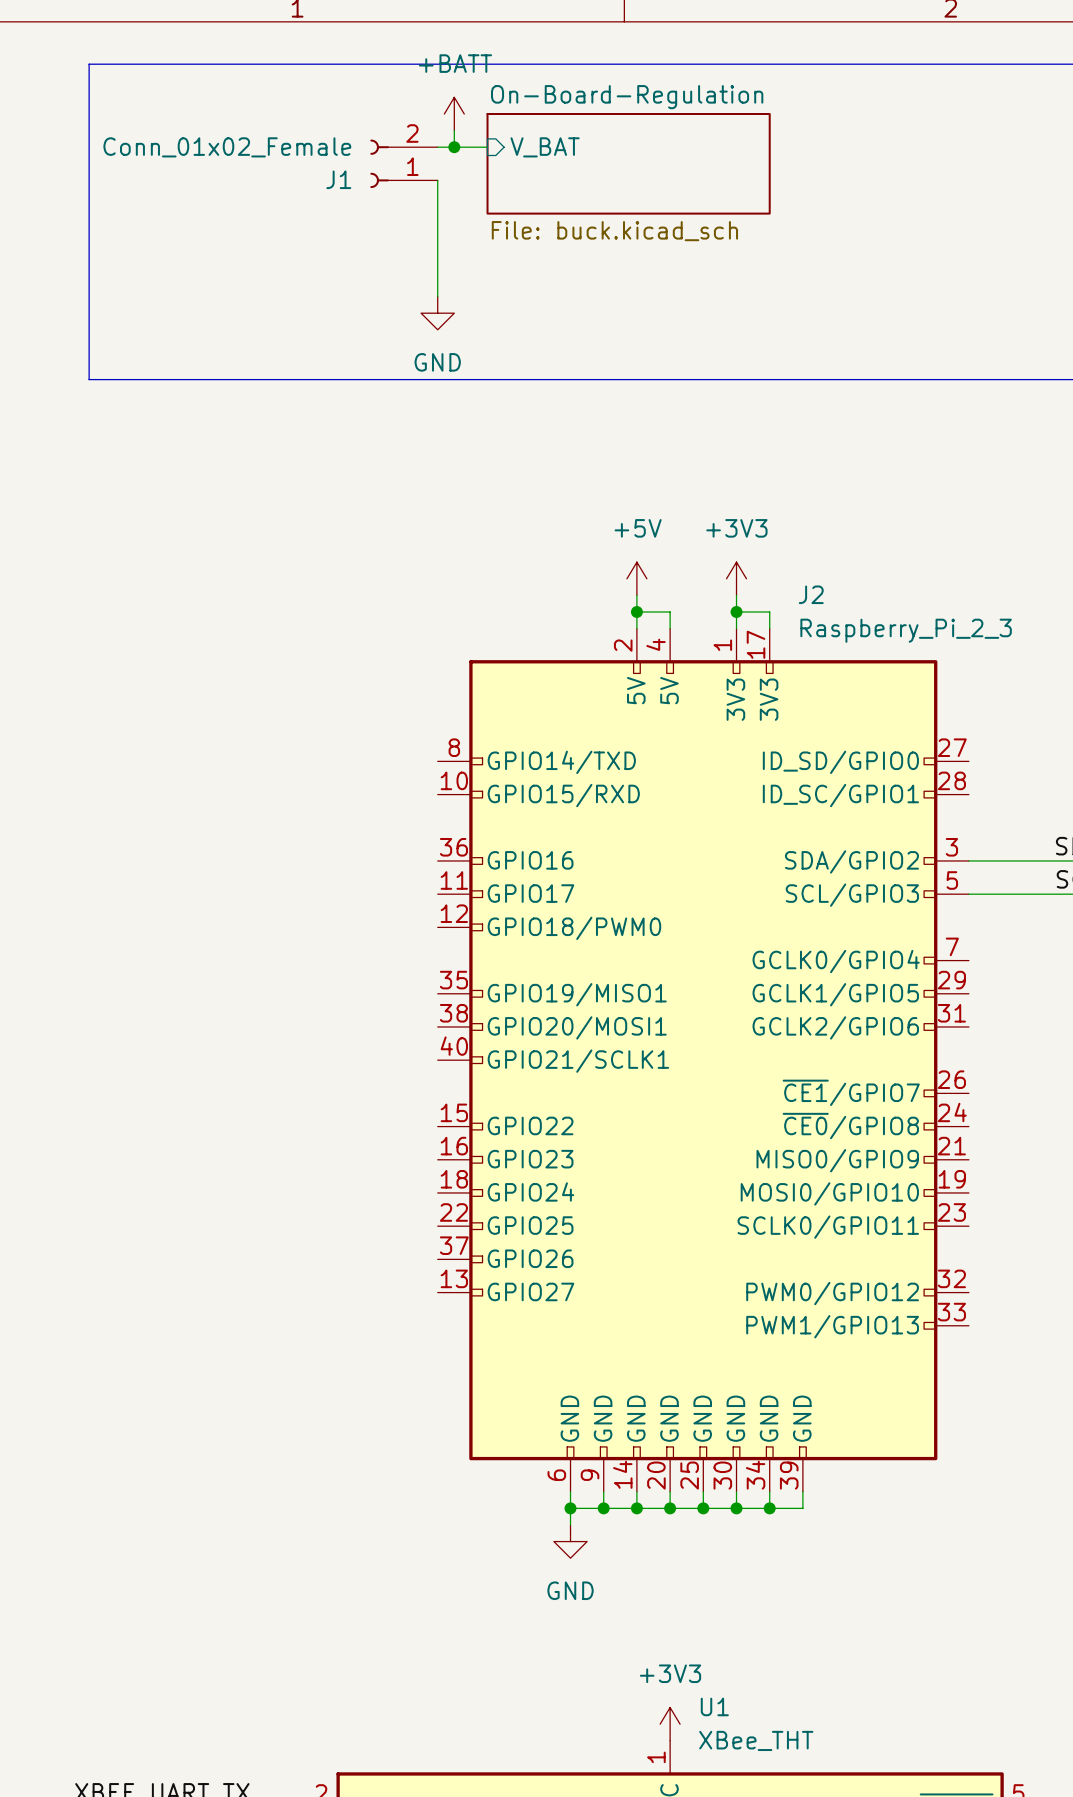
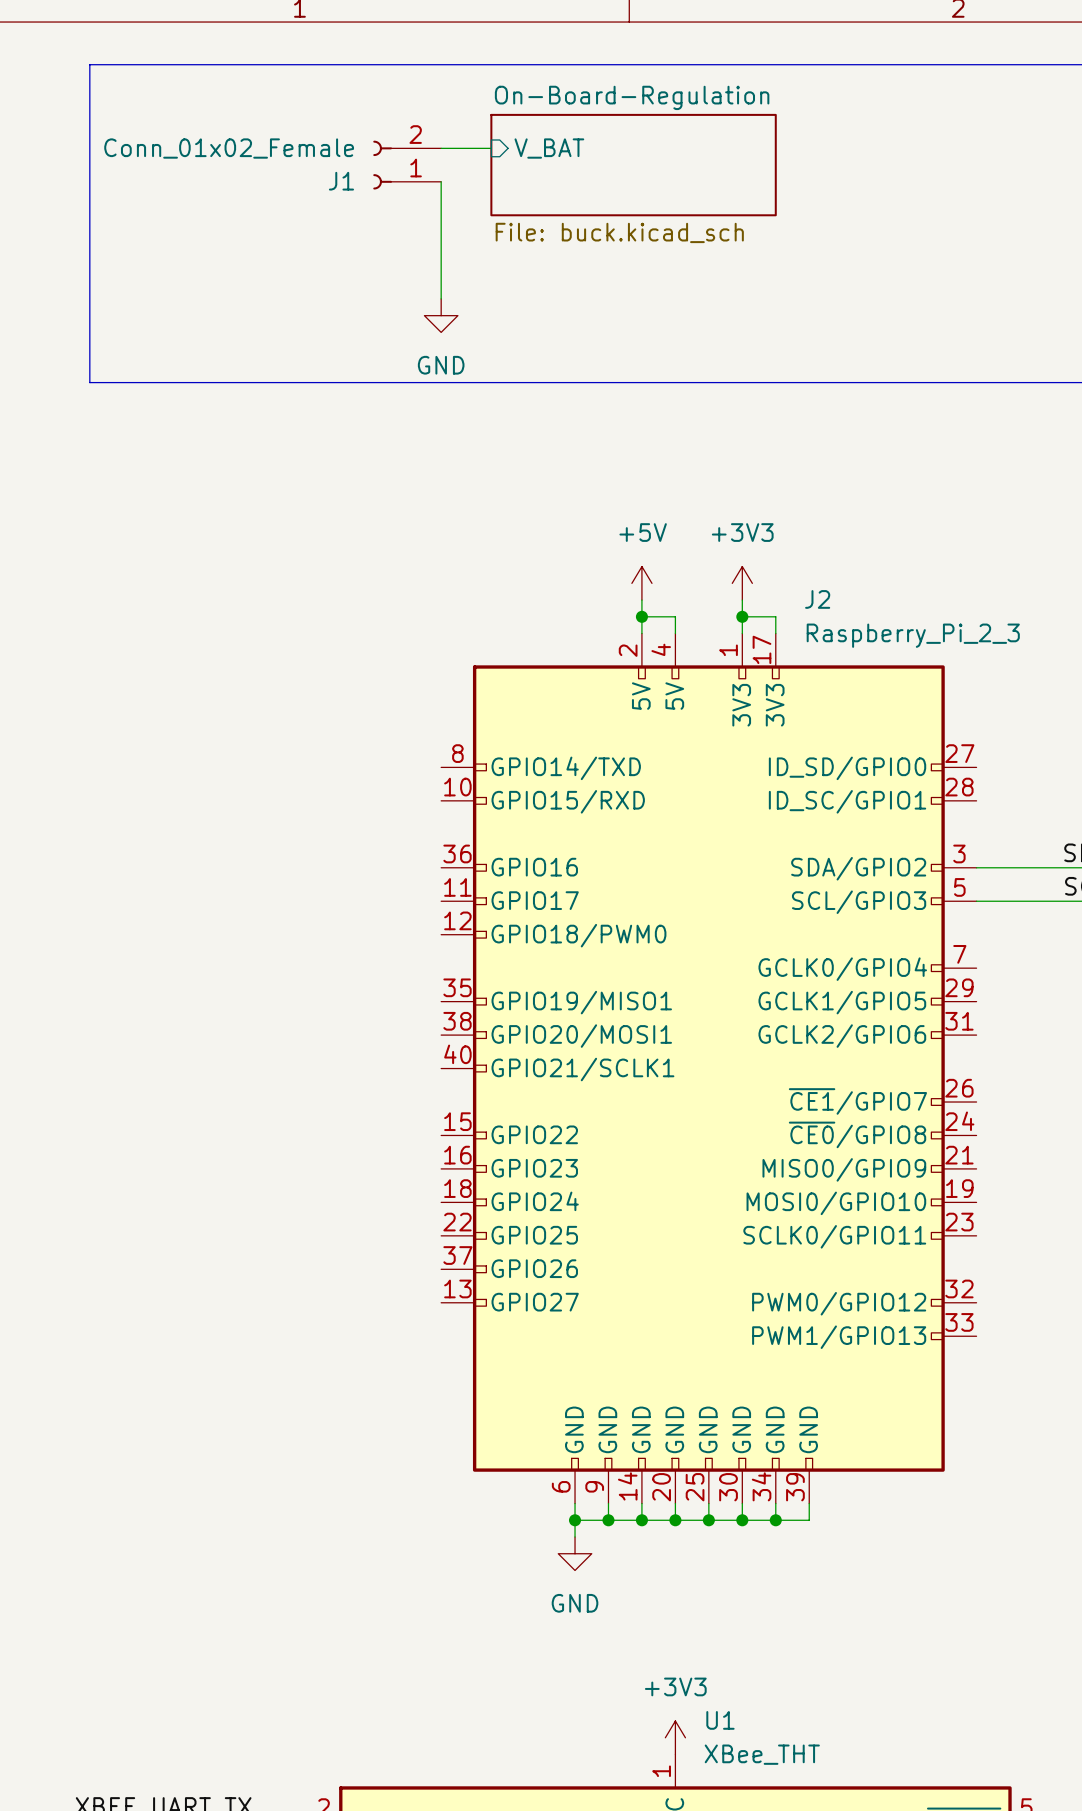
power symbol: +BATT (454, 113) -> none
wire: (454, 130) (454, 147) -> none
junction: (454, 147) -> none

